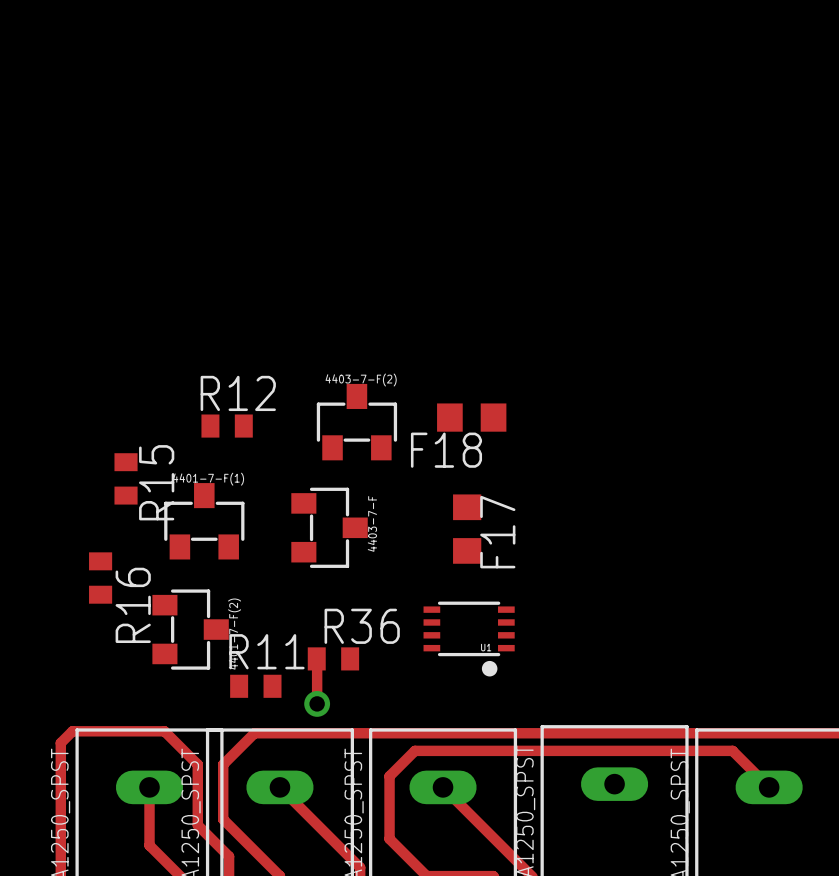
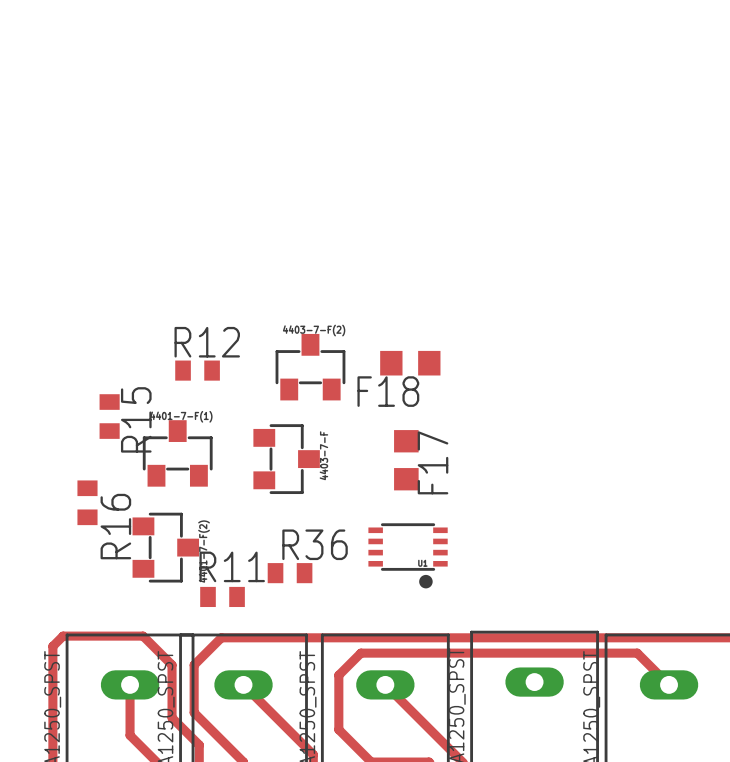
track: (316, 658) (317, 703) -> none
via: (317, 703) -> none

